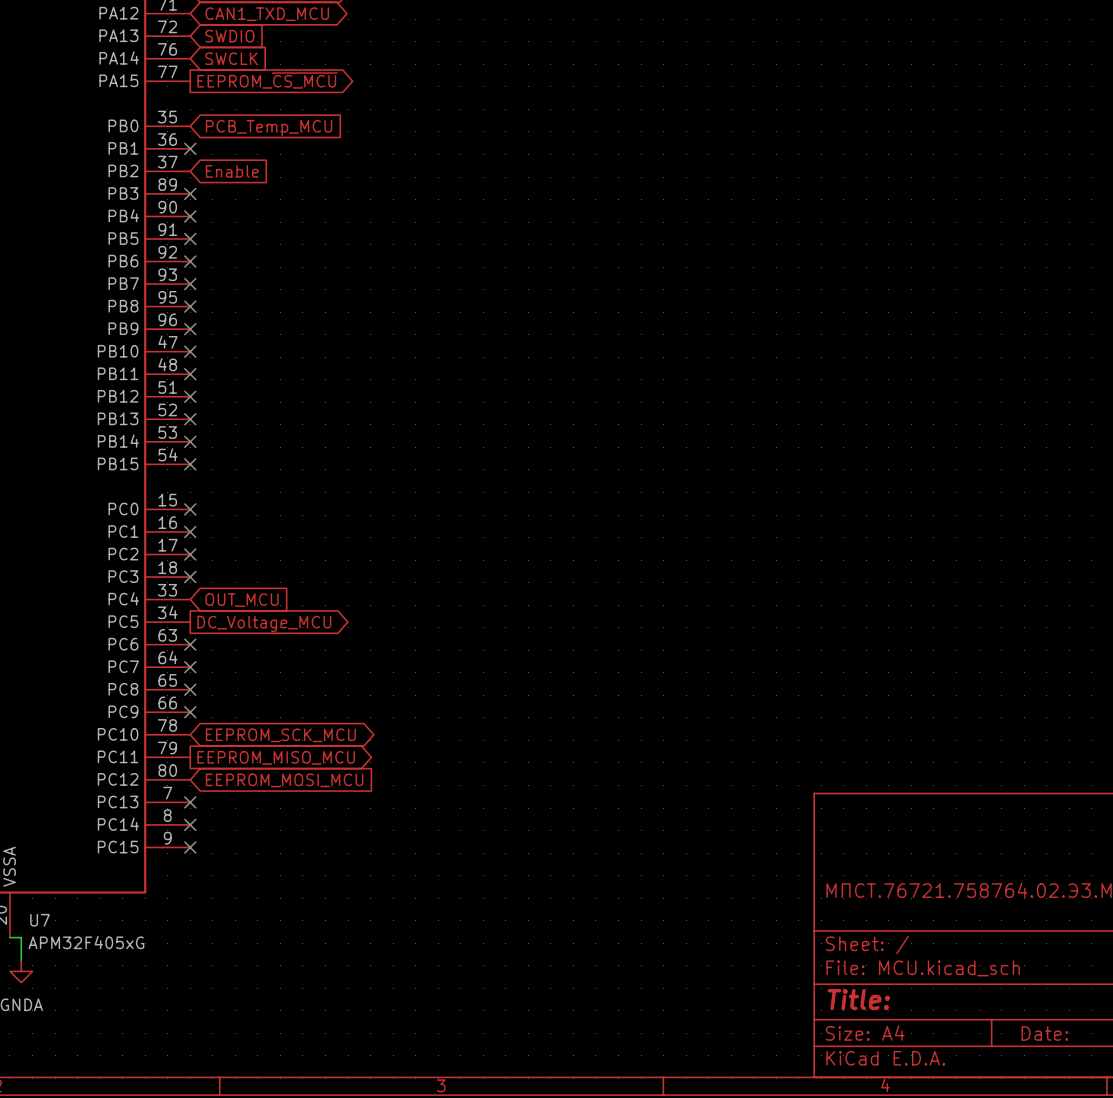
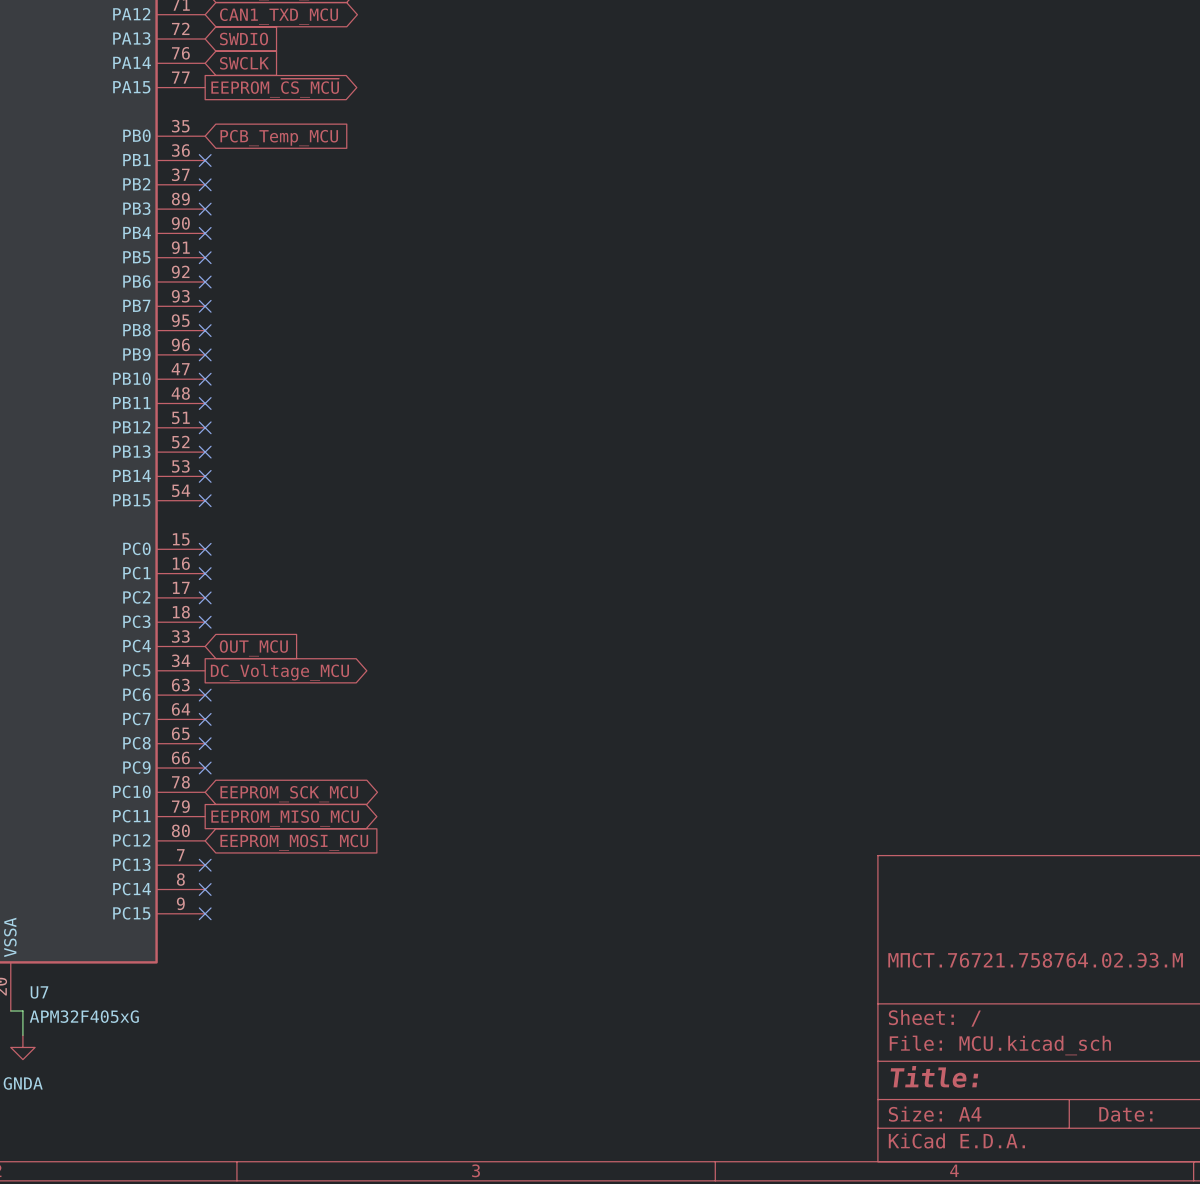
no-connect mark: none -> (205, 184)
global label: Enable (232, 171) -> none

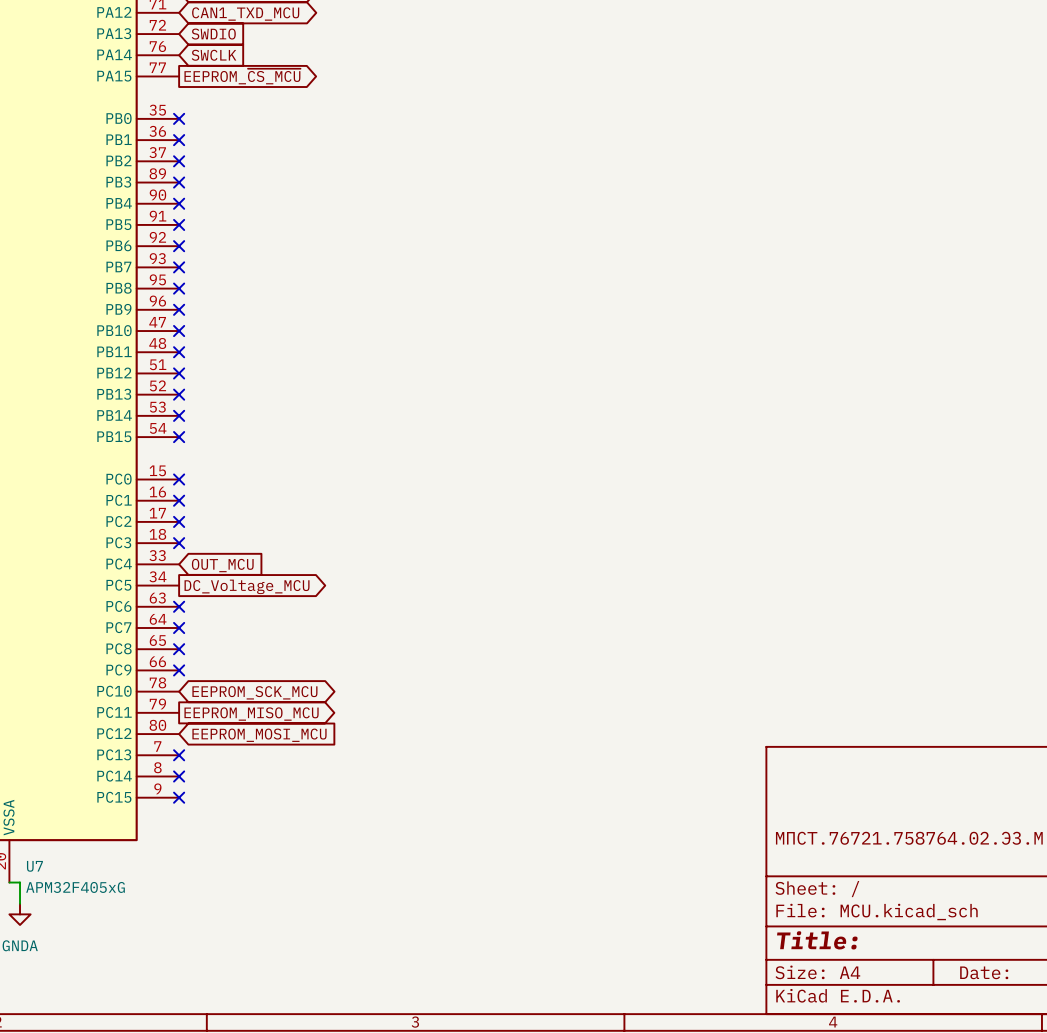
no-connect mark: none -> (179, 118)
global label: PCB_Temp_MCU (279, 138) -> none

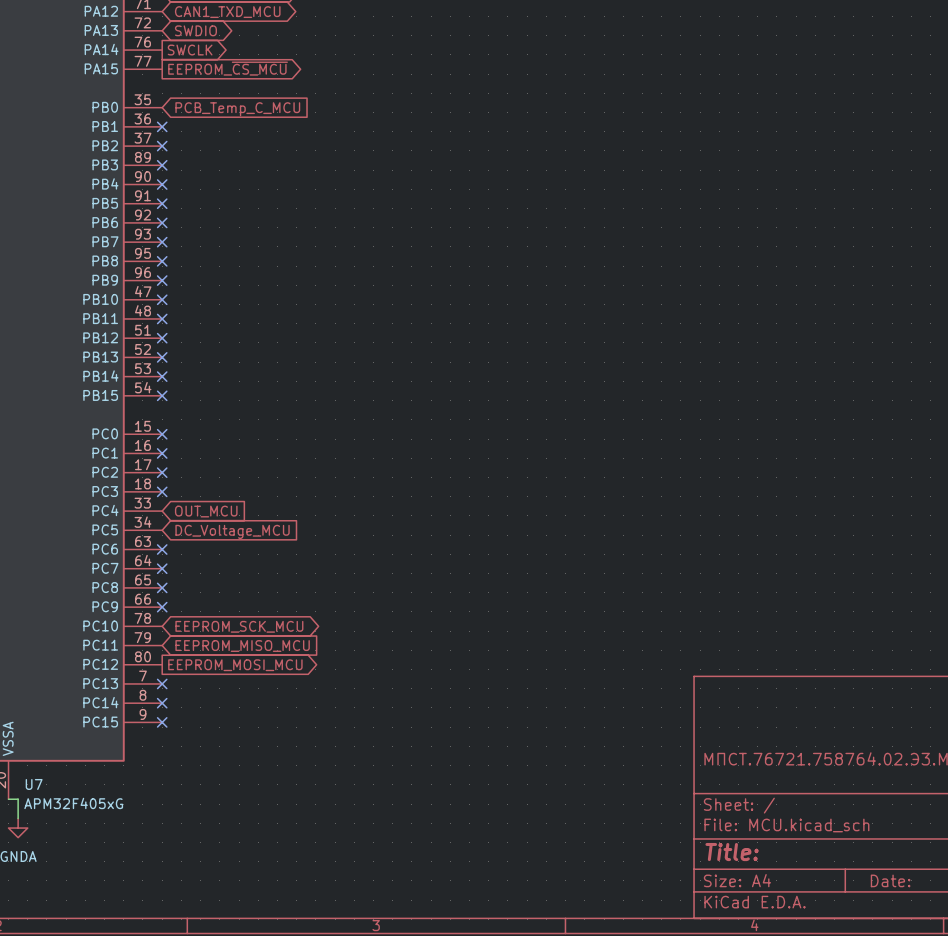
global label shape: input (213, 34) -> bidirectional (195, 30)
global label shape: input (214, 55) -> output (190, 50)
no-connect mark: (179, 118) -> none
global label: none -> PCB_Temp_C_MCU (237, 109)
global label shape: output (247, 586) -> input (232, 531)
global label shape: output (251, 714) -> input (242, 646)
global label shape: input (259, 735) -> output (235, 665)

